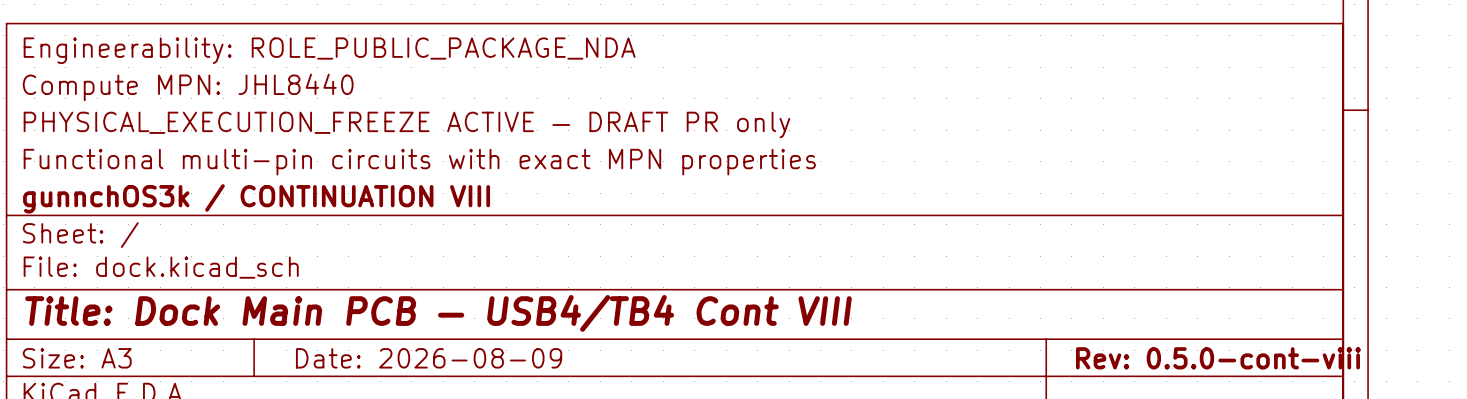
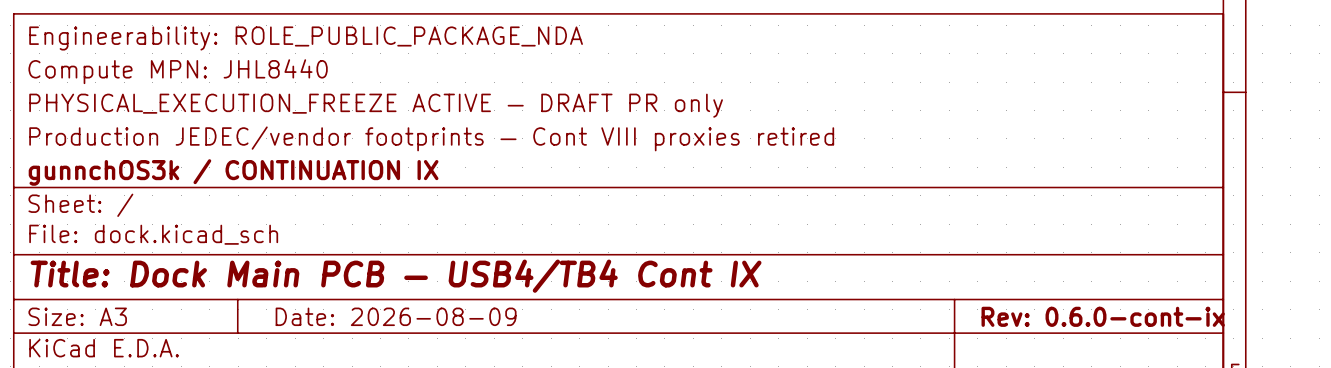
title block: Functional multi-pin circuits with exact MPN properties (419, 162) -> Production JEDEC/vendor footprints — Cont VIII proxies retired (431, 138)
title block: gunnchOS3k / CONTINUATION VIII (256, 198) -> gunnchOS3k / CONTINUATION IX (233, 172)
title block: Title: Dock Main PCB — USB4/TB4 Cont VIII (438, 313) -> Title: Dock Main PCB — USB4/TB4 Cont IX (396, 276)
title block: Rev: 0.5.0-cont-viii (1218, 358) -> Rev: 0.6.0-cont-ix (1103, 316)

